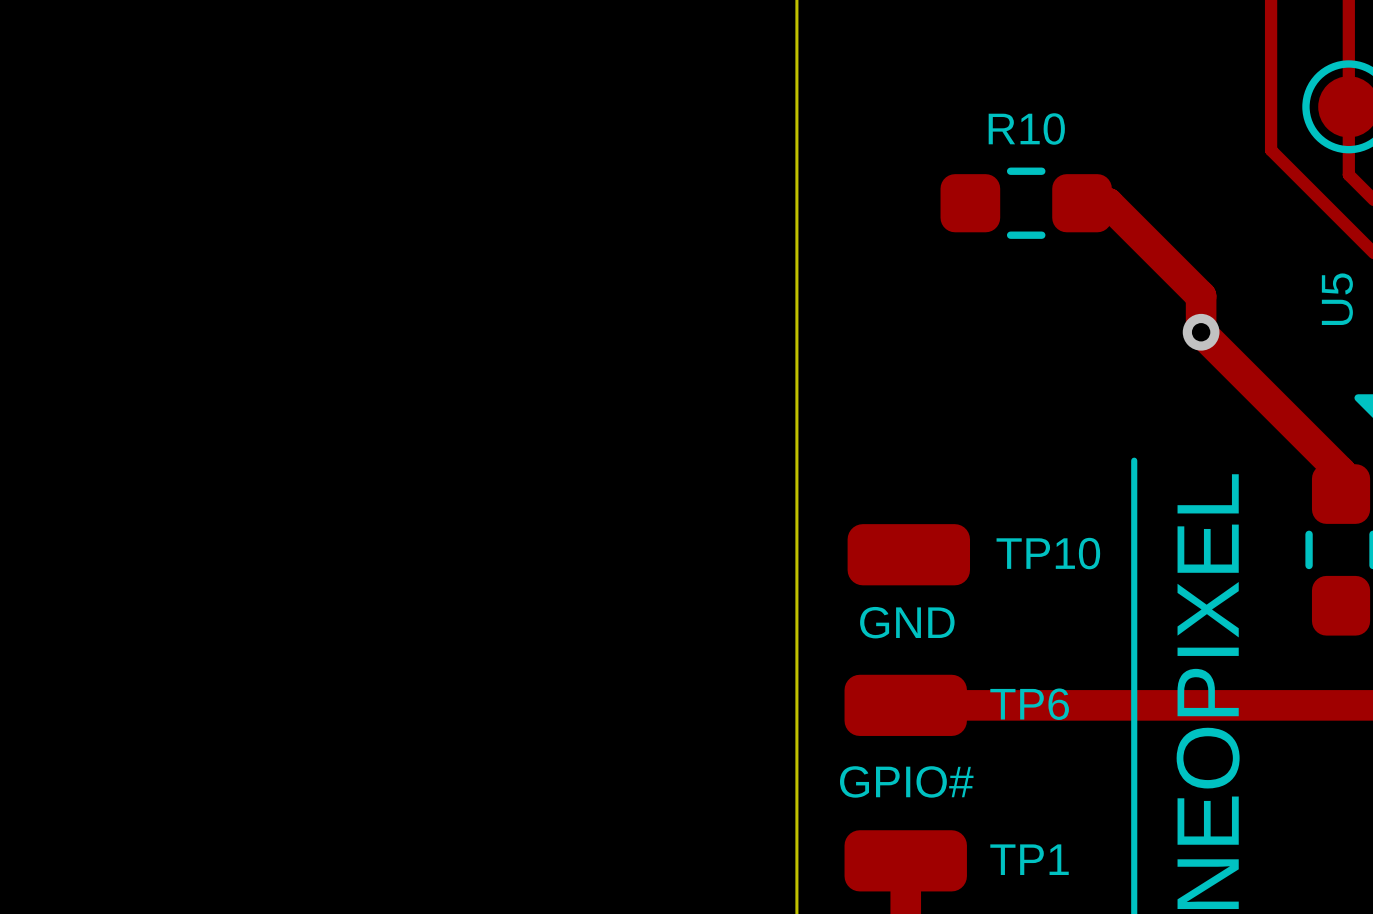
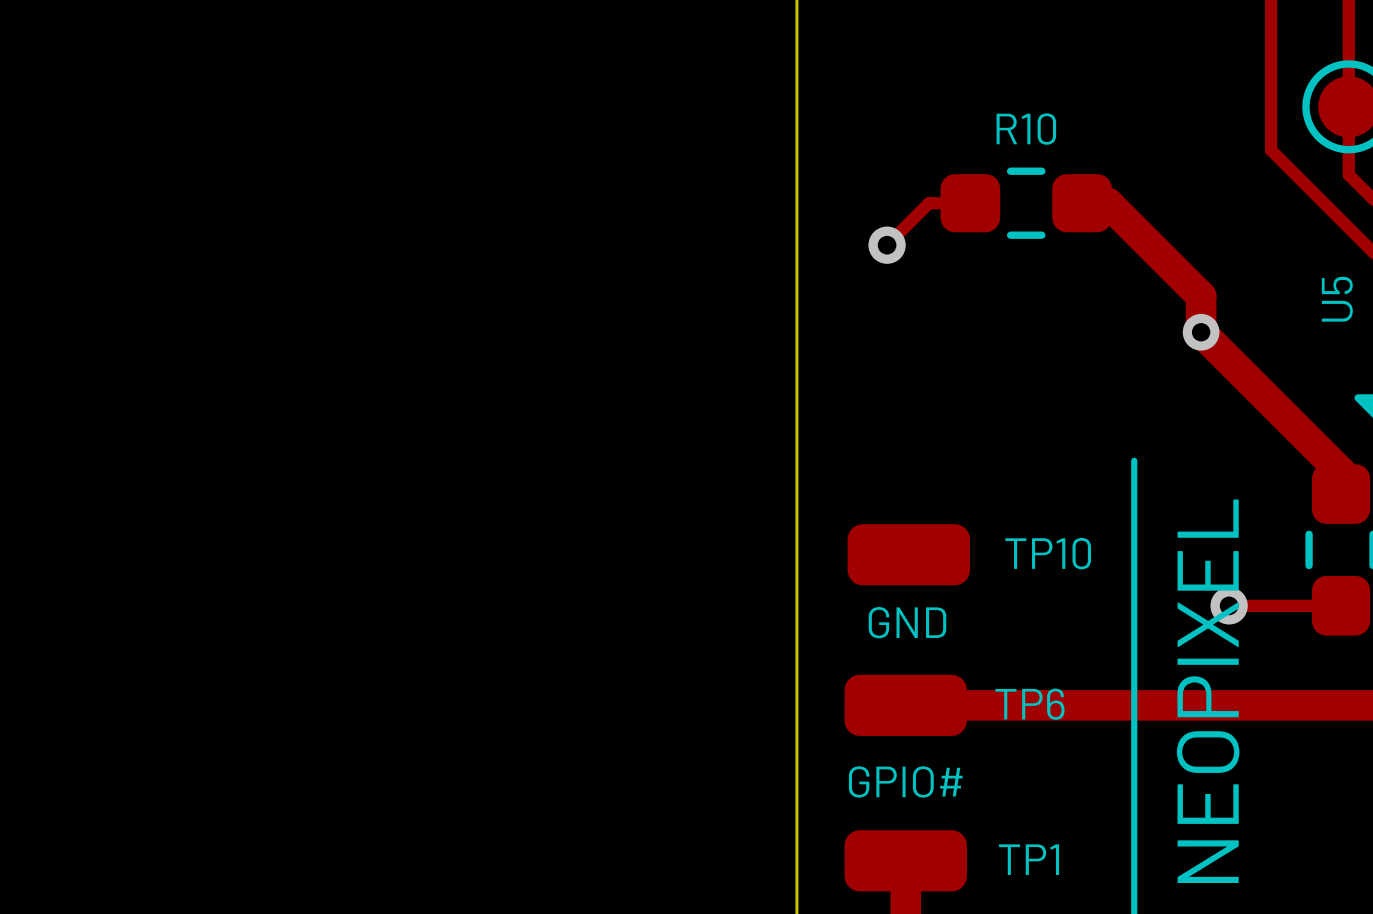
track: none -> (970, 203) (929, 203) (887, 245)
via: none -> (887, 245)
track: none -> (1229, 605) (1340, 605)
via: none -> (1229, 605)

